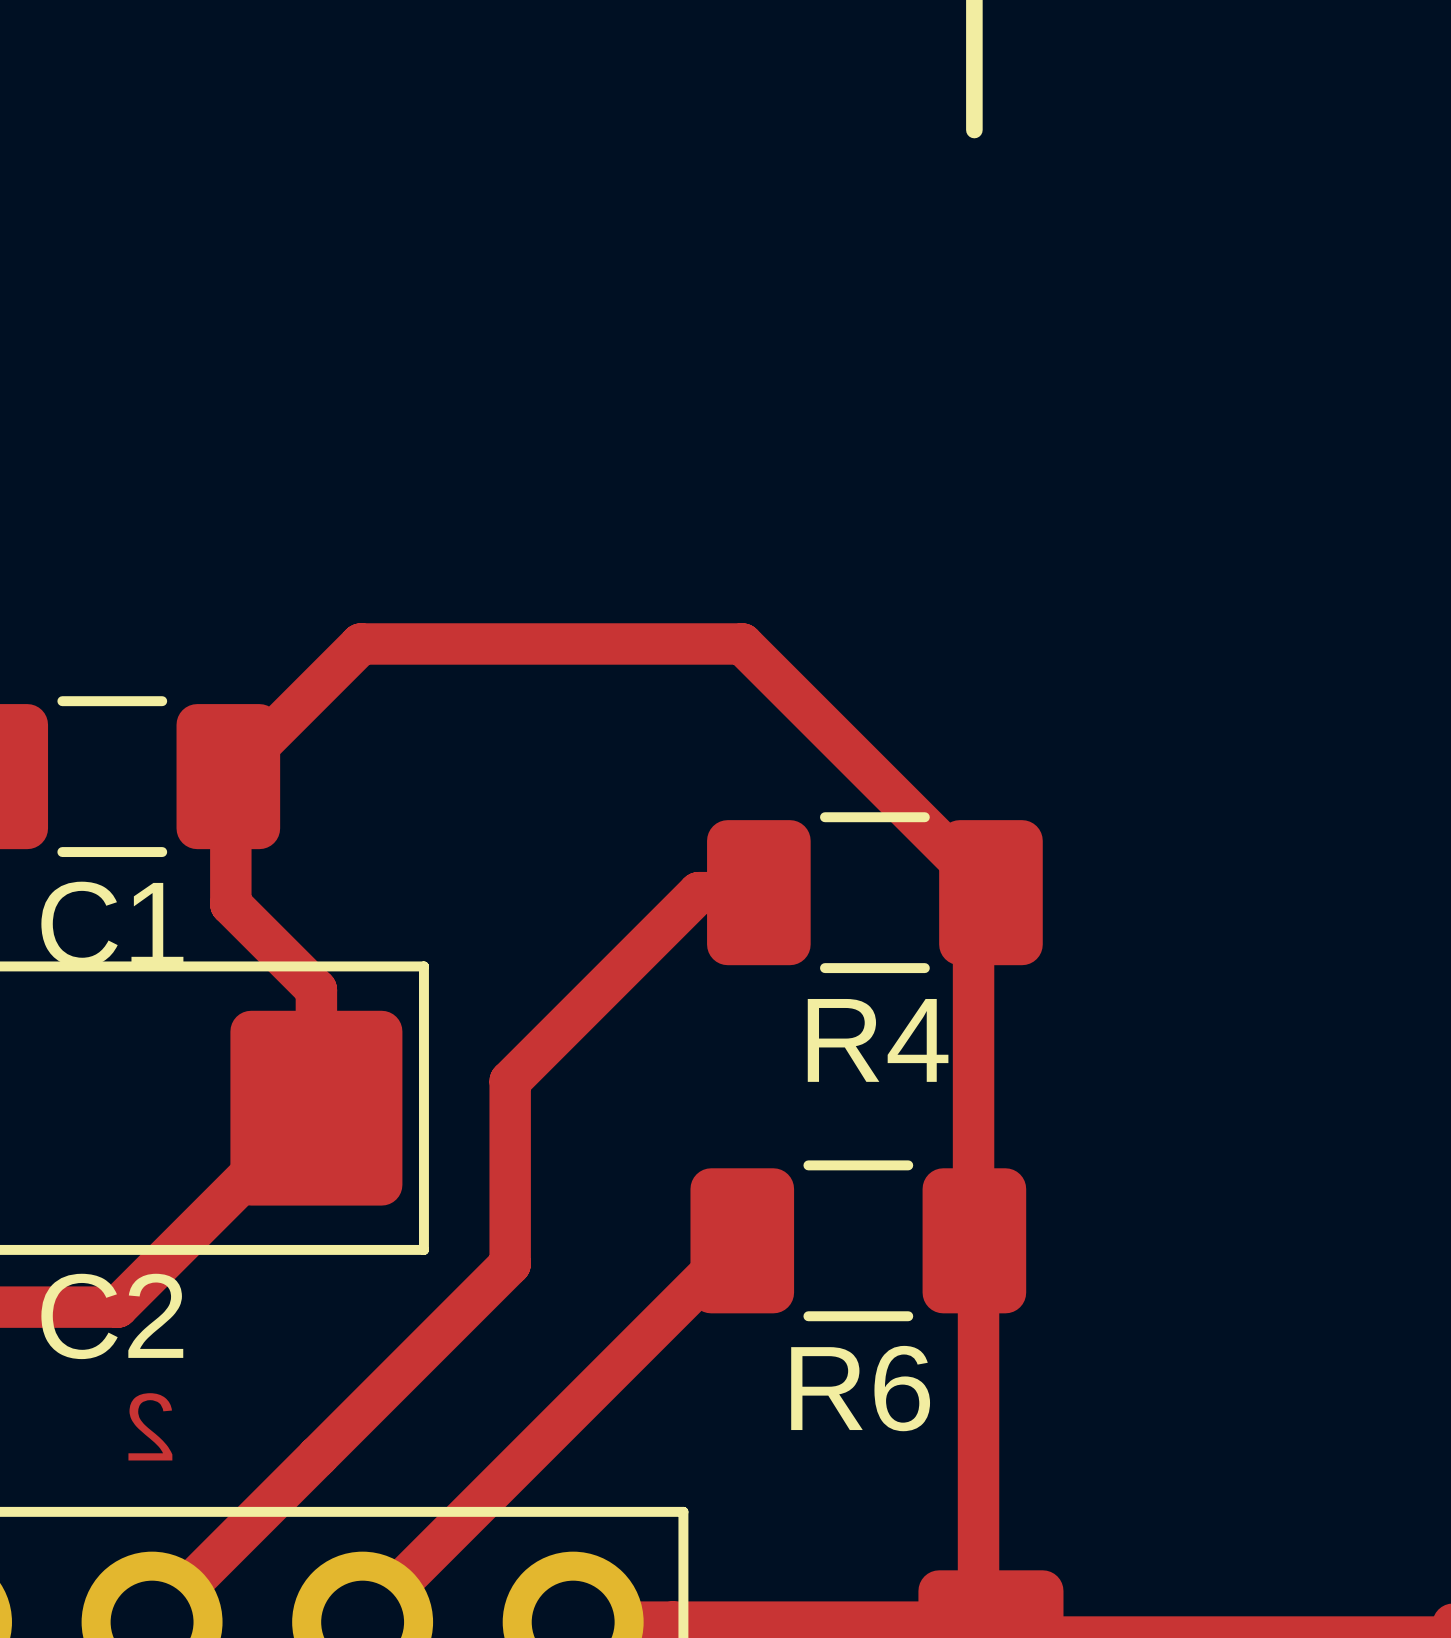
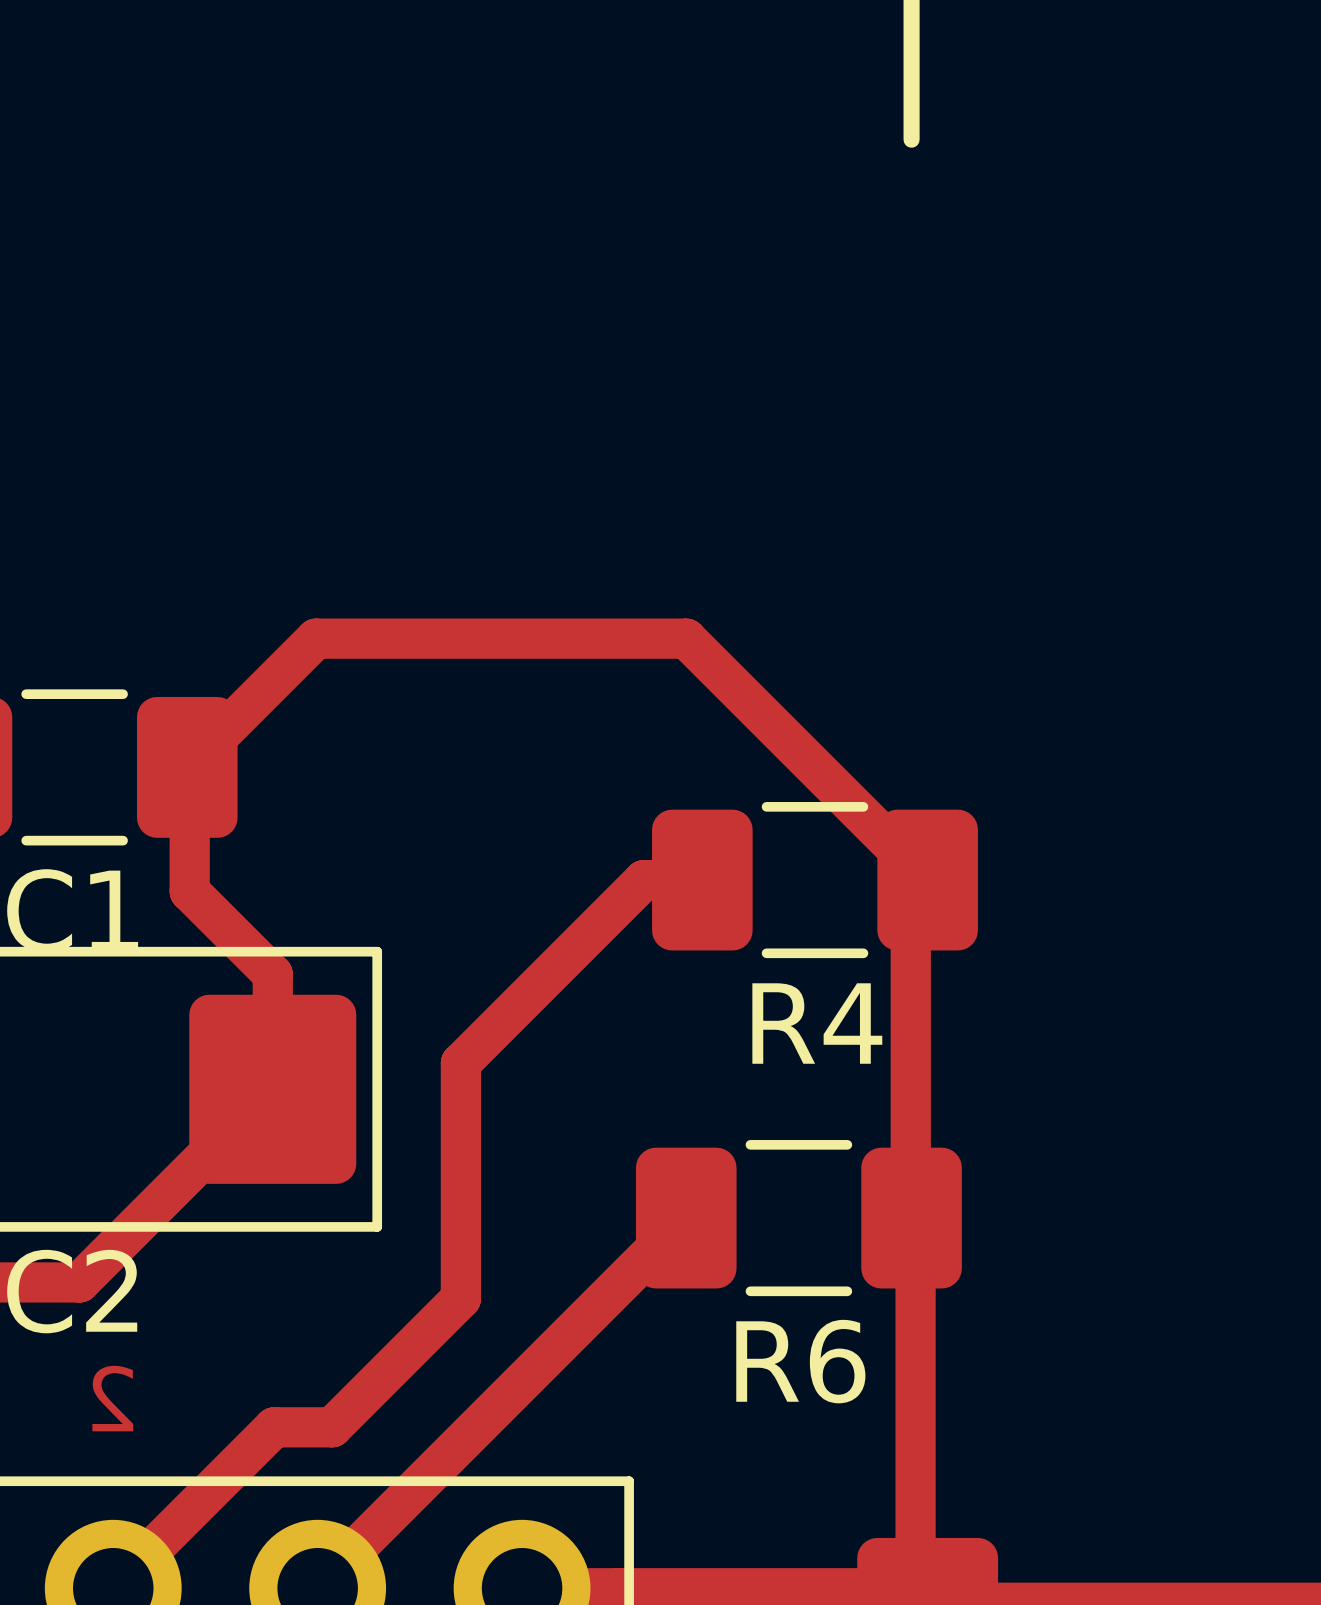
track: (510, 1264) (317, 1456) -> (460, 1240) (460, 1298) (332, 1427) (274, 1427)

